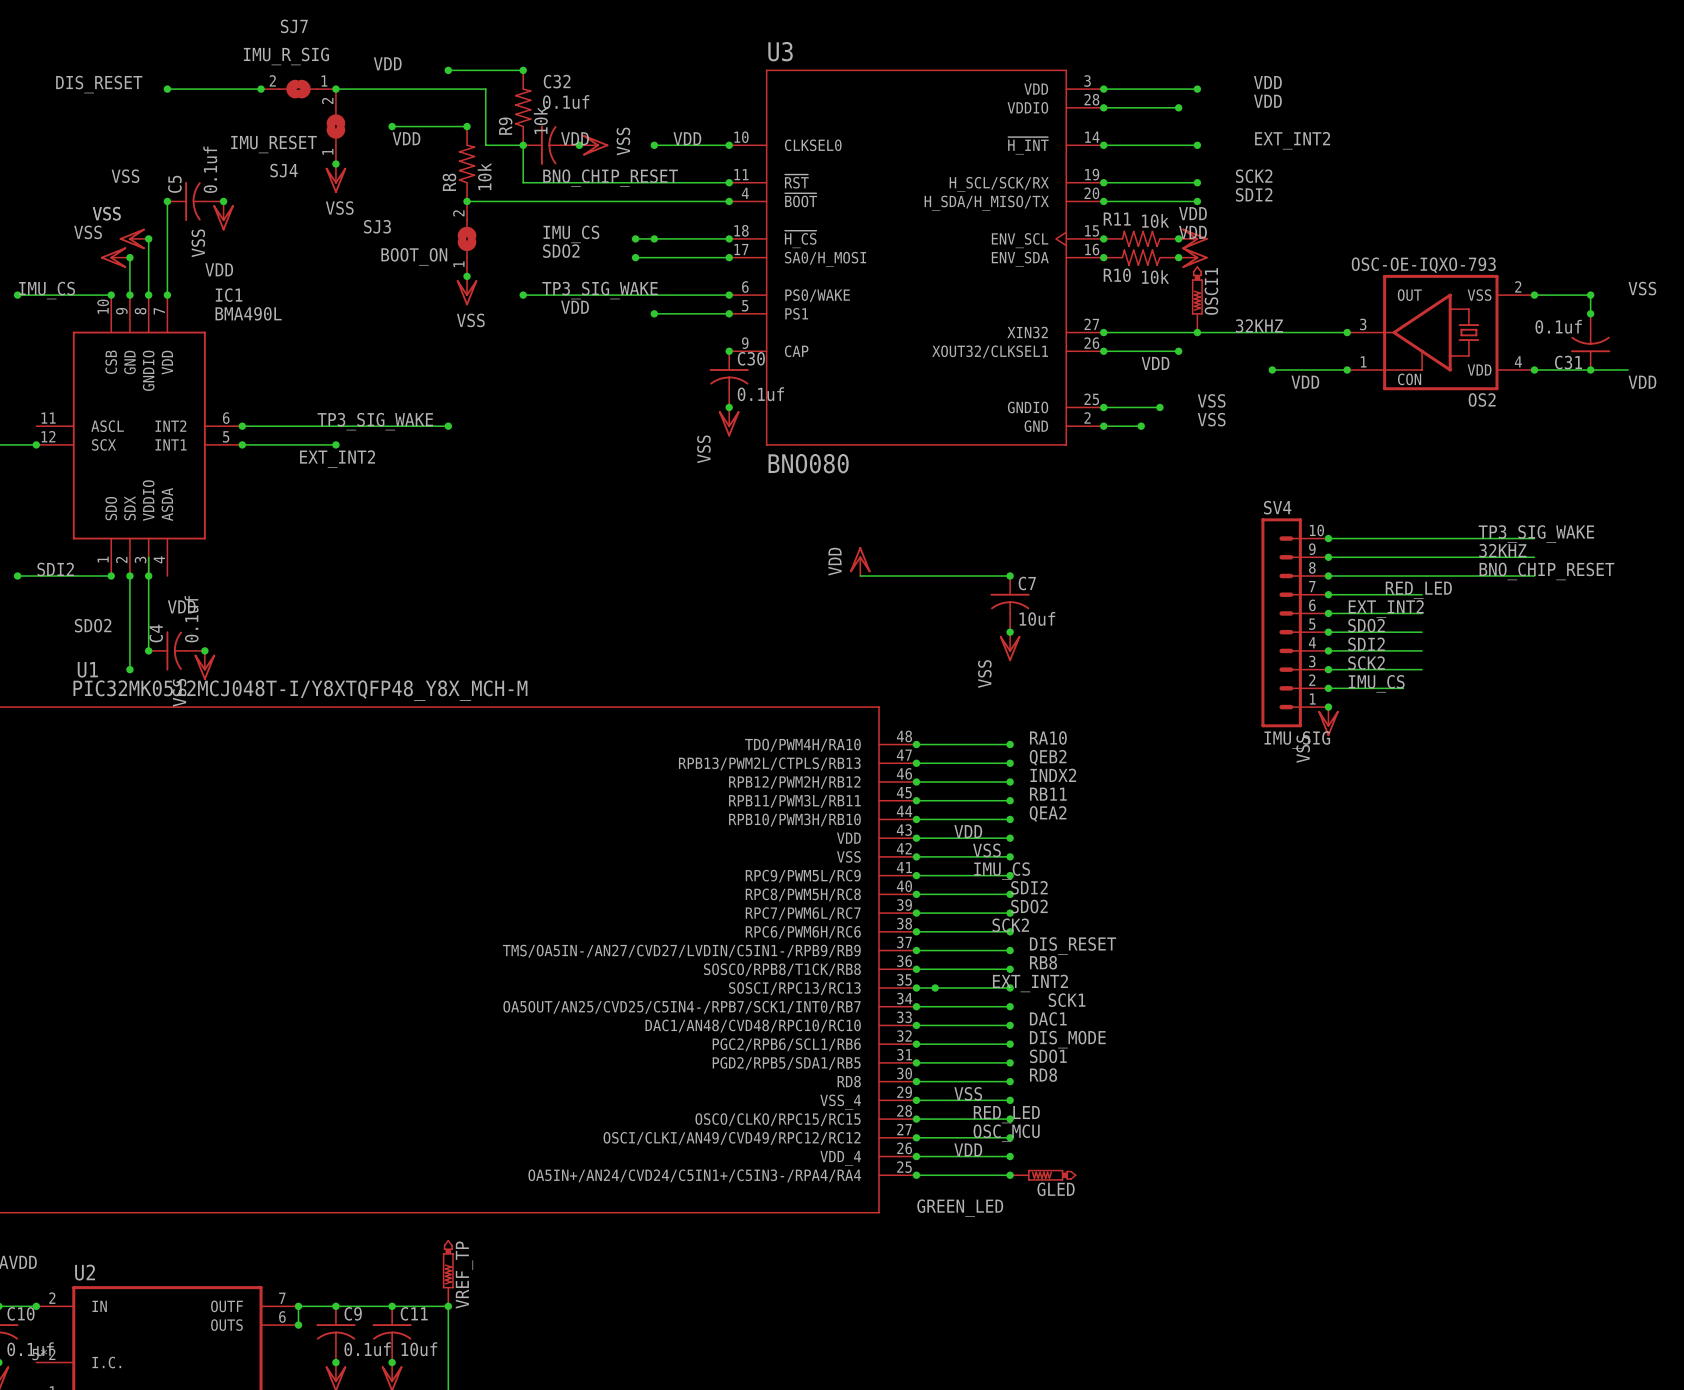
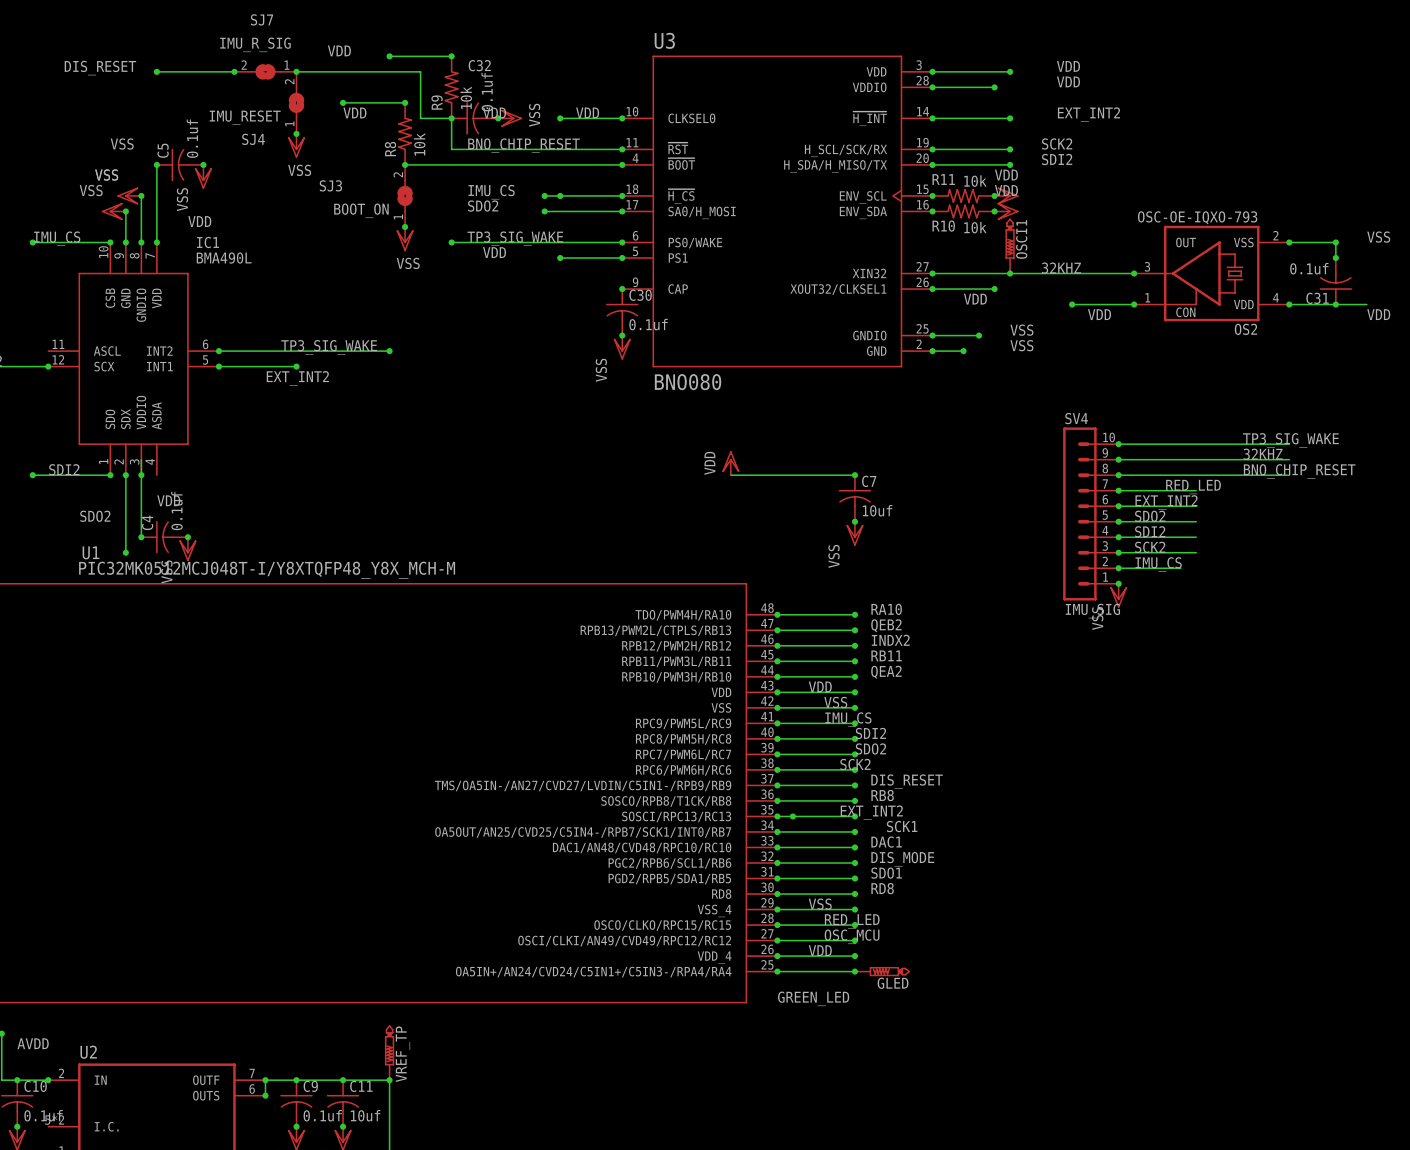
C32 value rotation: 0° (566, 102) -> 90° counterclockwise (487, 92)

